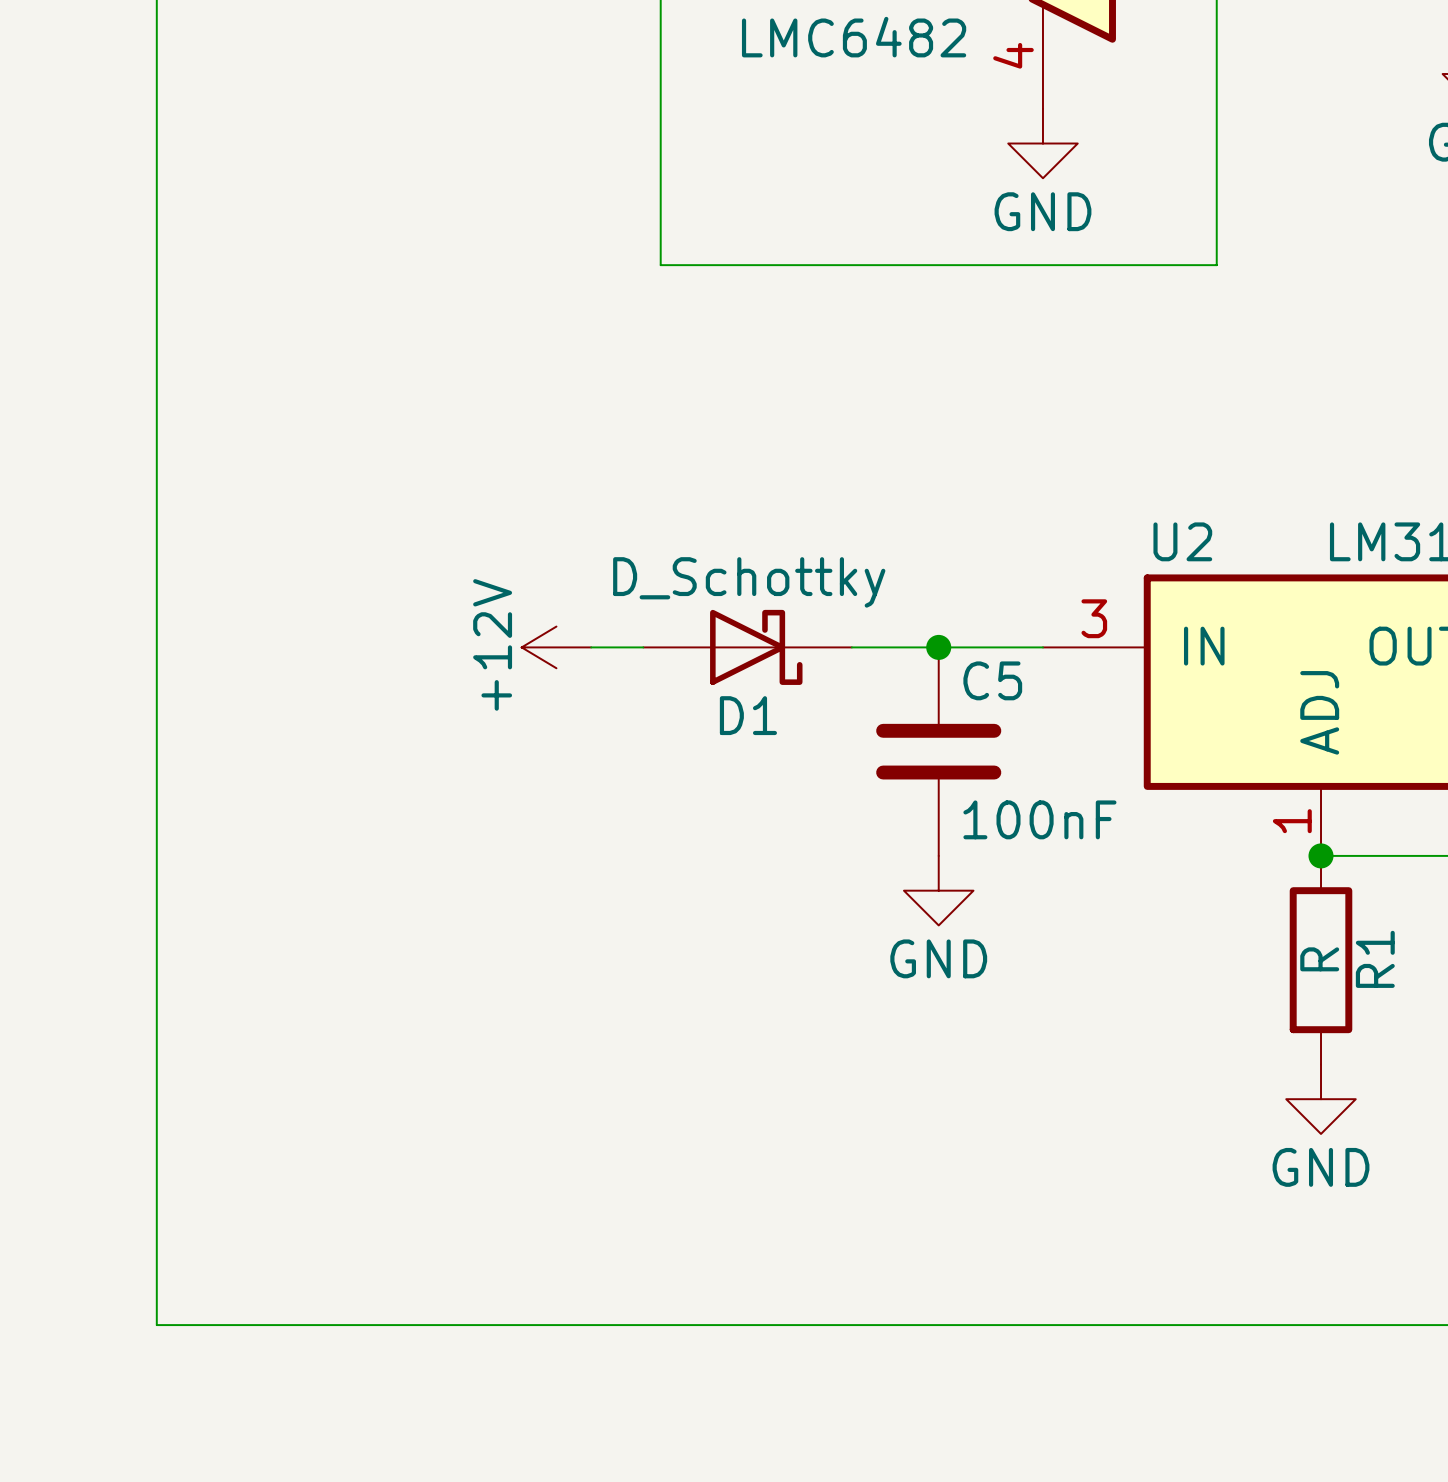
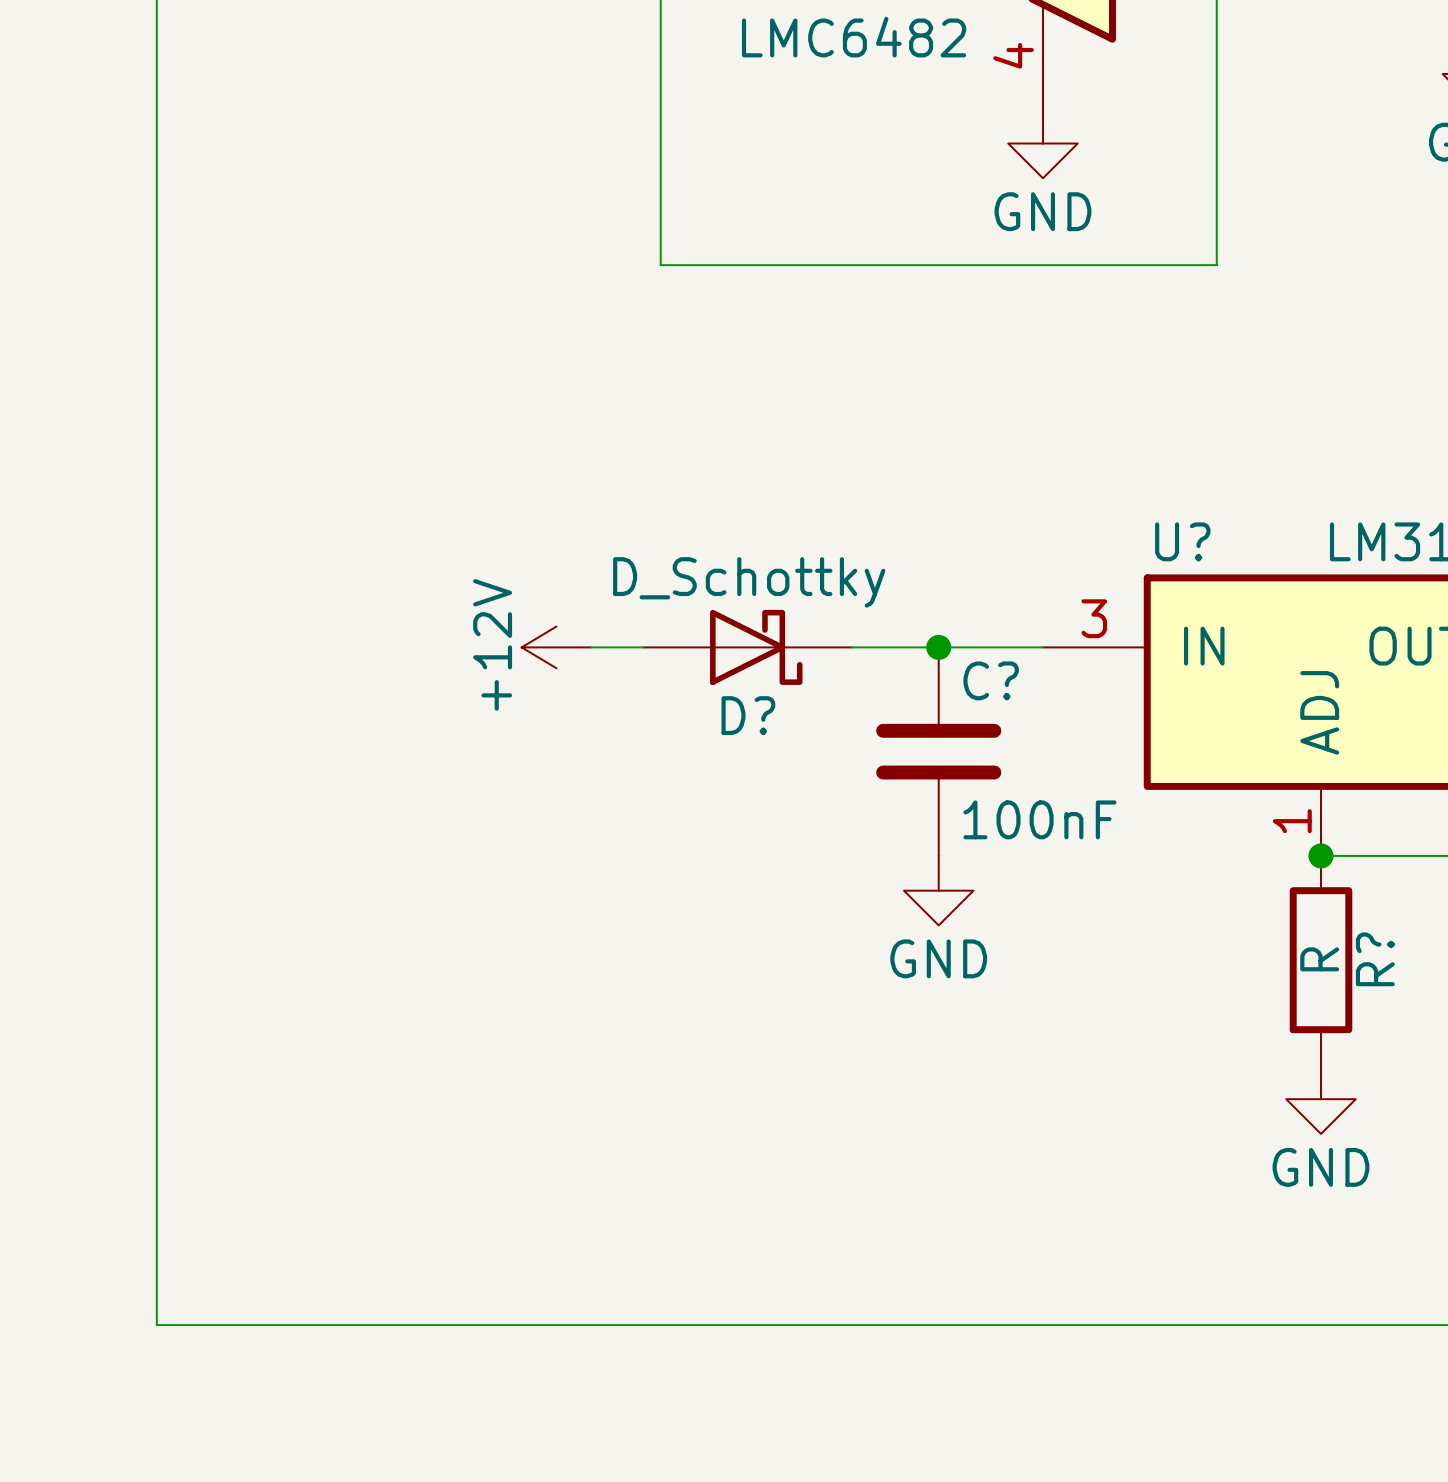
U2 name: U2 (1182, 541) -> U? (1182, 541)
C5 name: C5 (992, 680) -> C? (991, 680)
D1 name: D1 (748, 715) -> D? (748, 715)
R1 name: R1 (1375, 959) -> R? (1375, 959)

